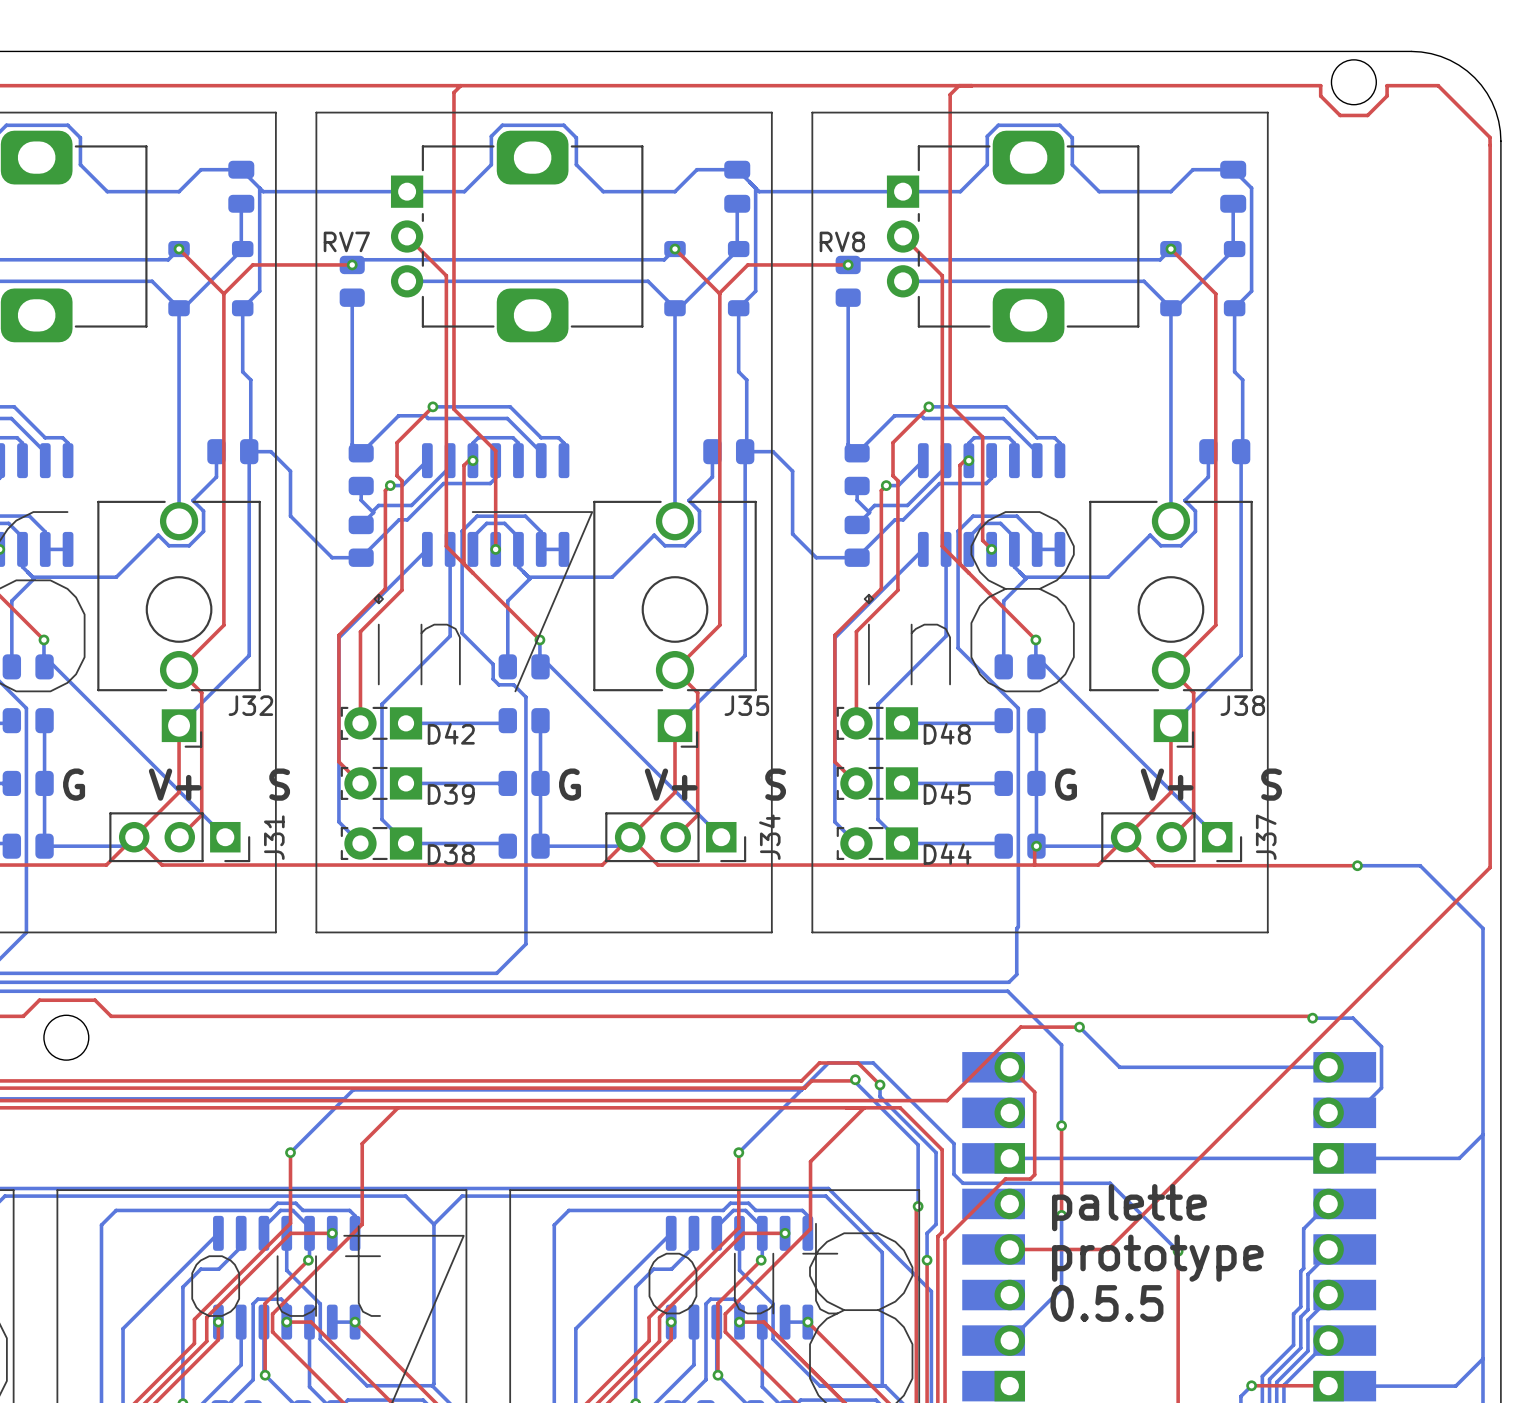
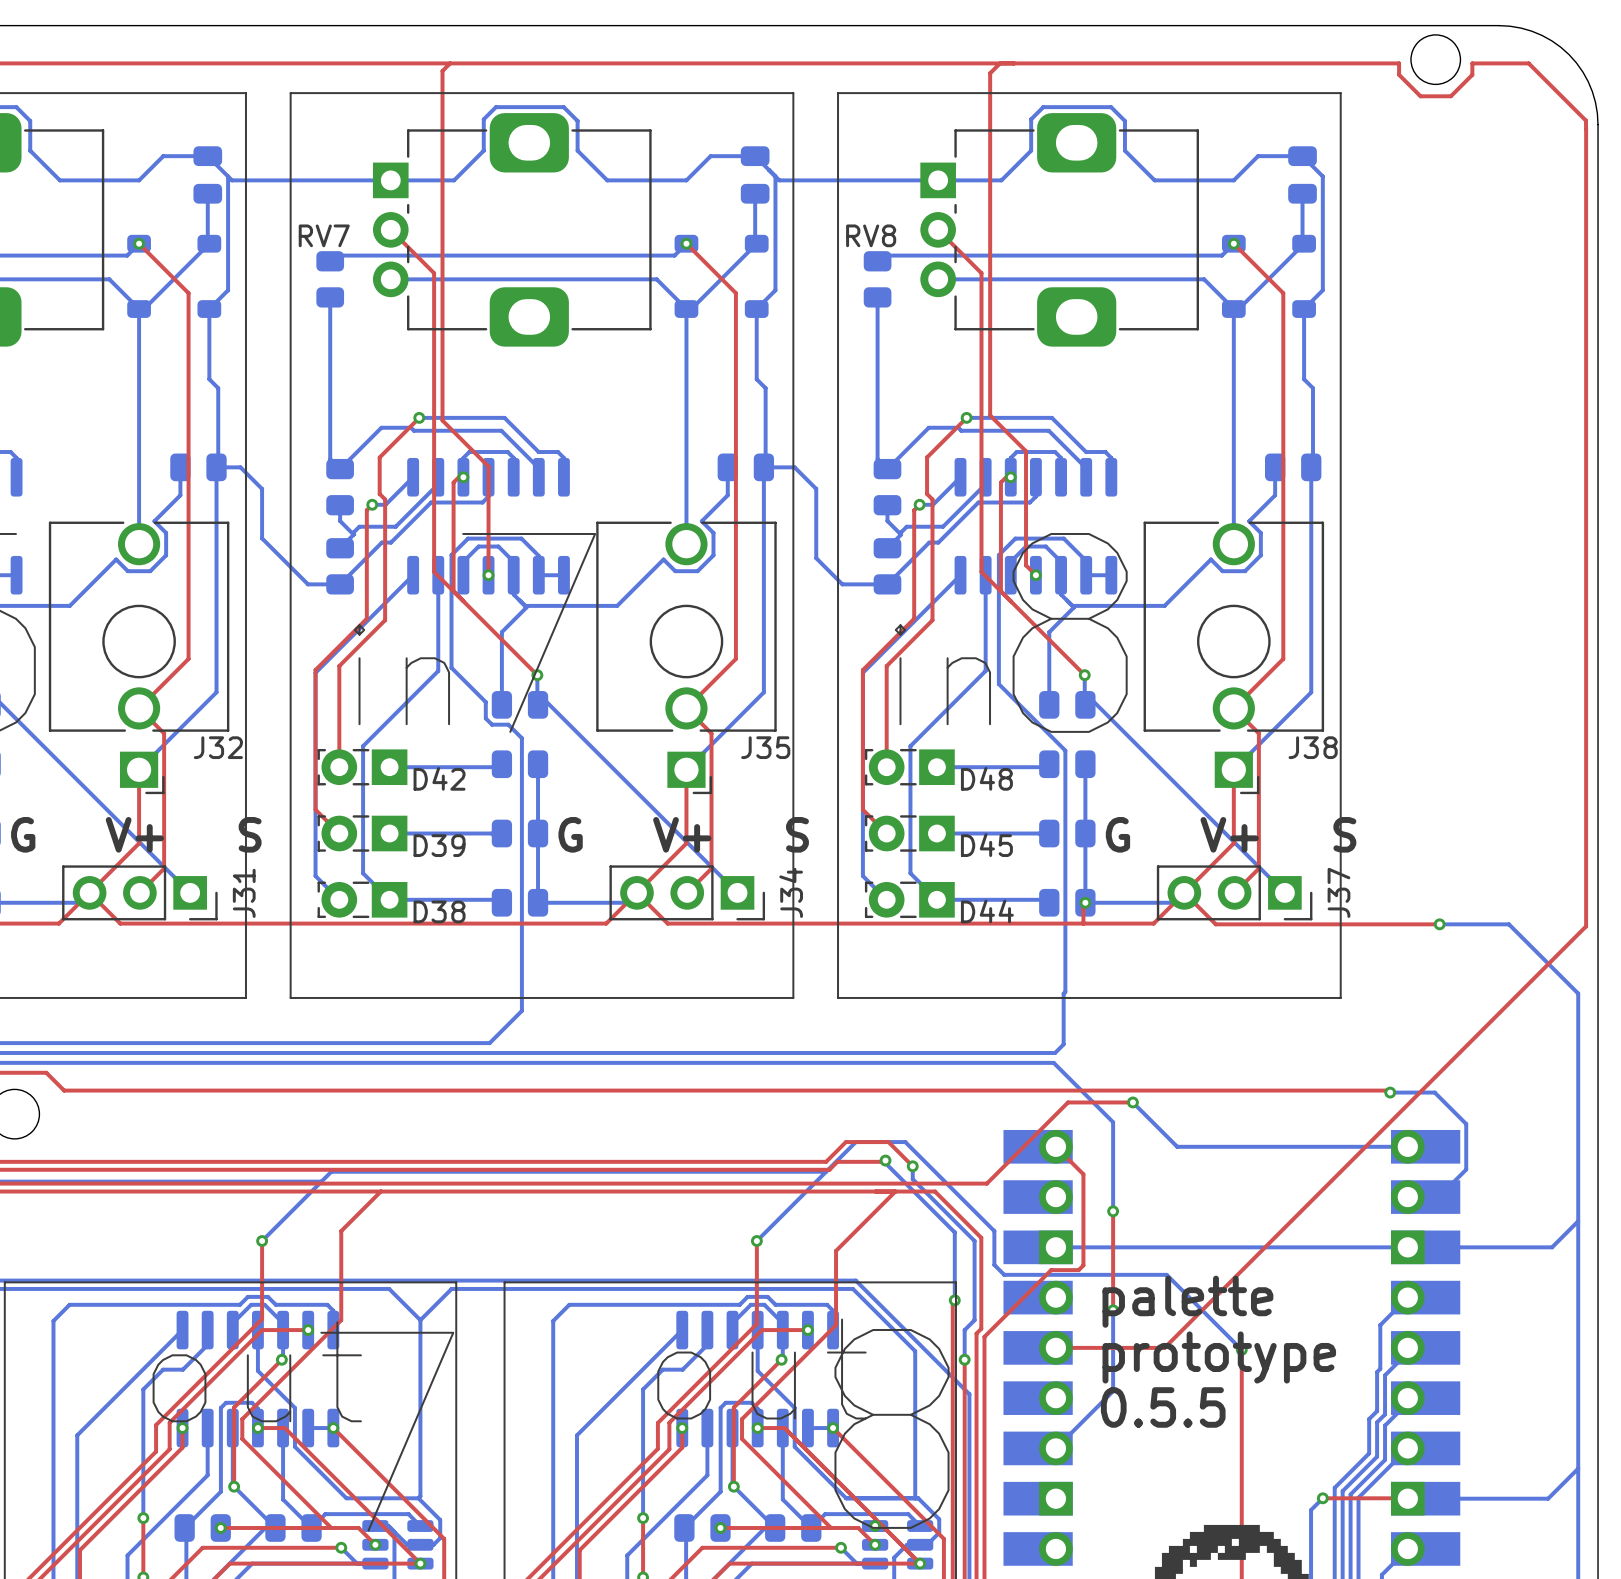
top track: (352, 264) (252, 264) (223, 293) -> none
via: (352, 264) -> none
top track: (848, 264) (747, 264) (719, 293) -> none
via: (848, 264) -> none

